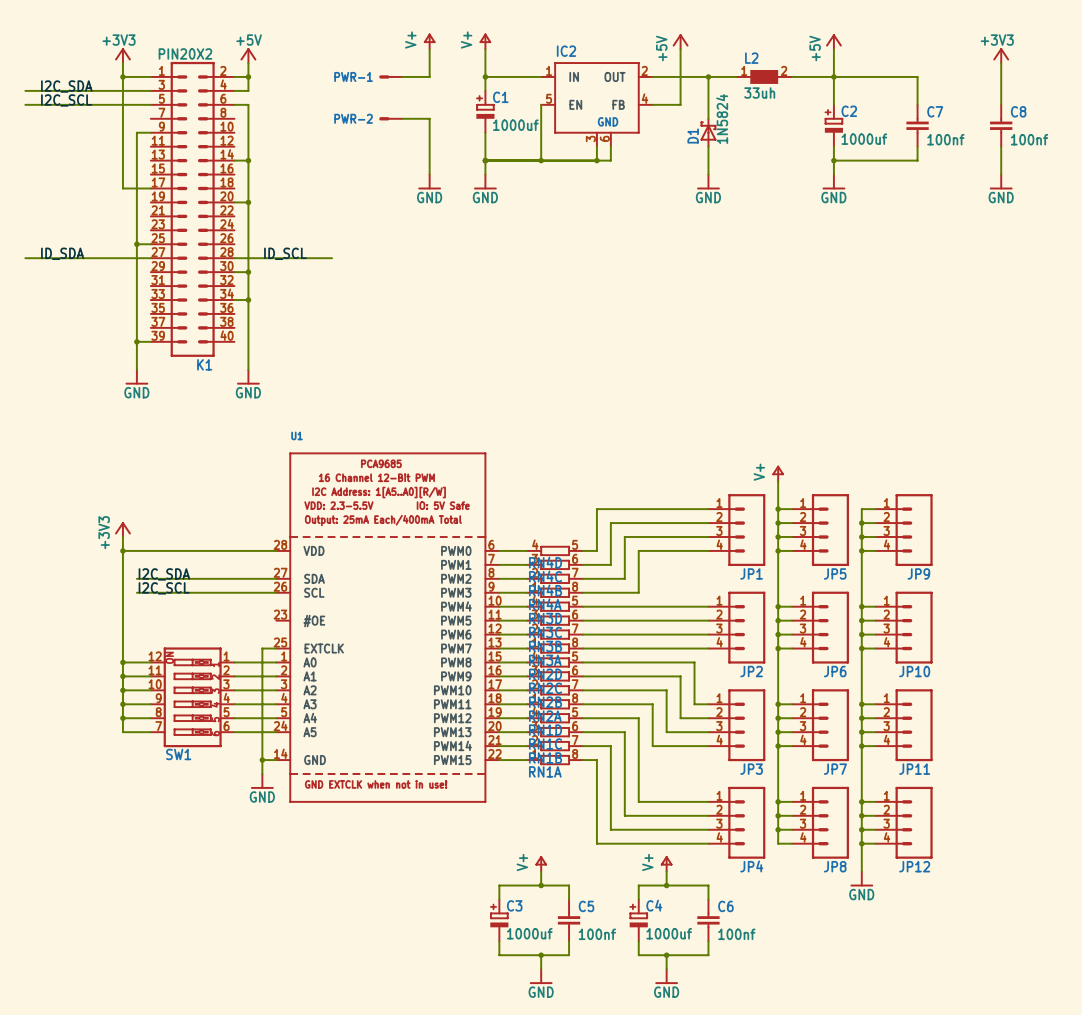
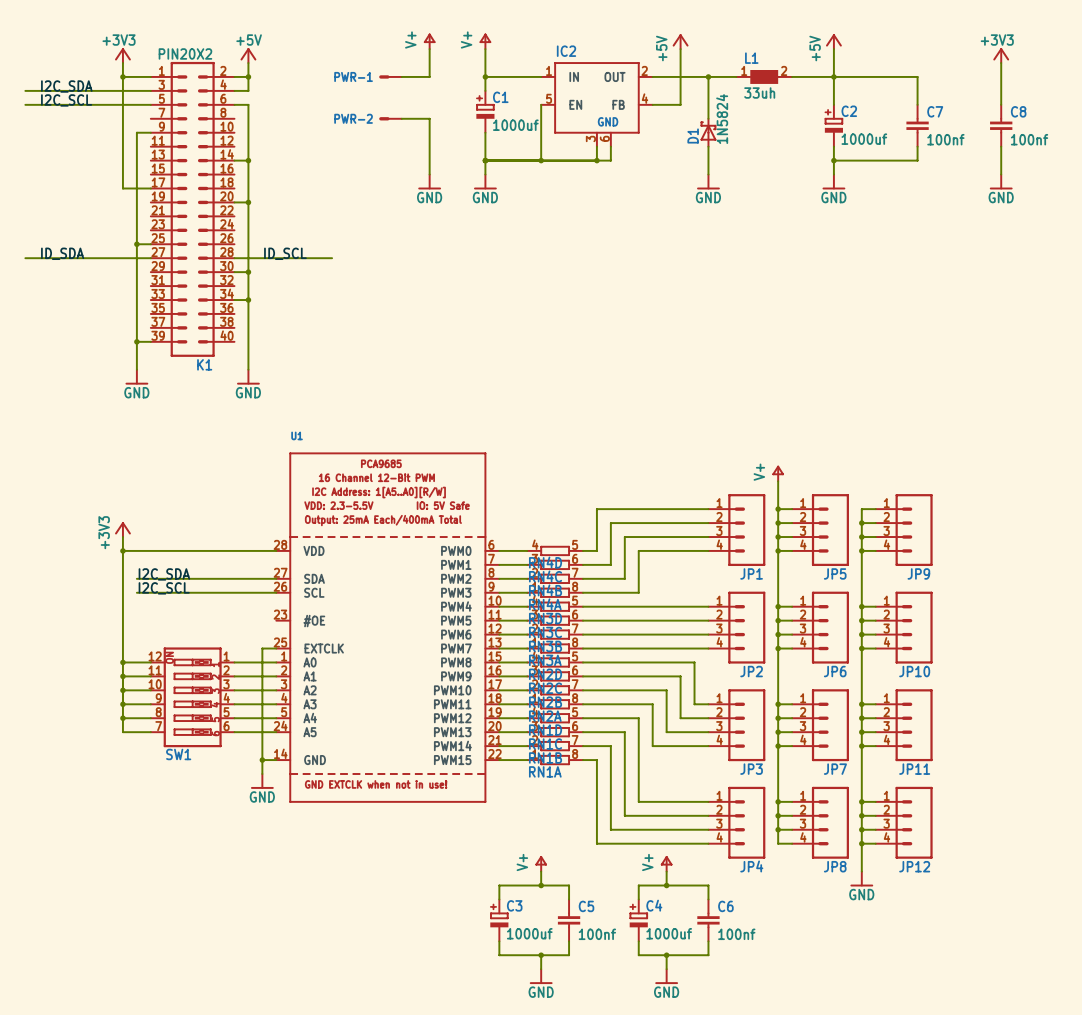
L2 name: L2 (751, 58) -> L1 (751, 58)

